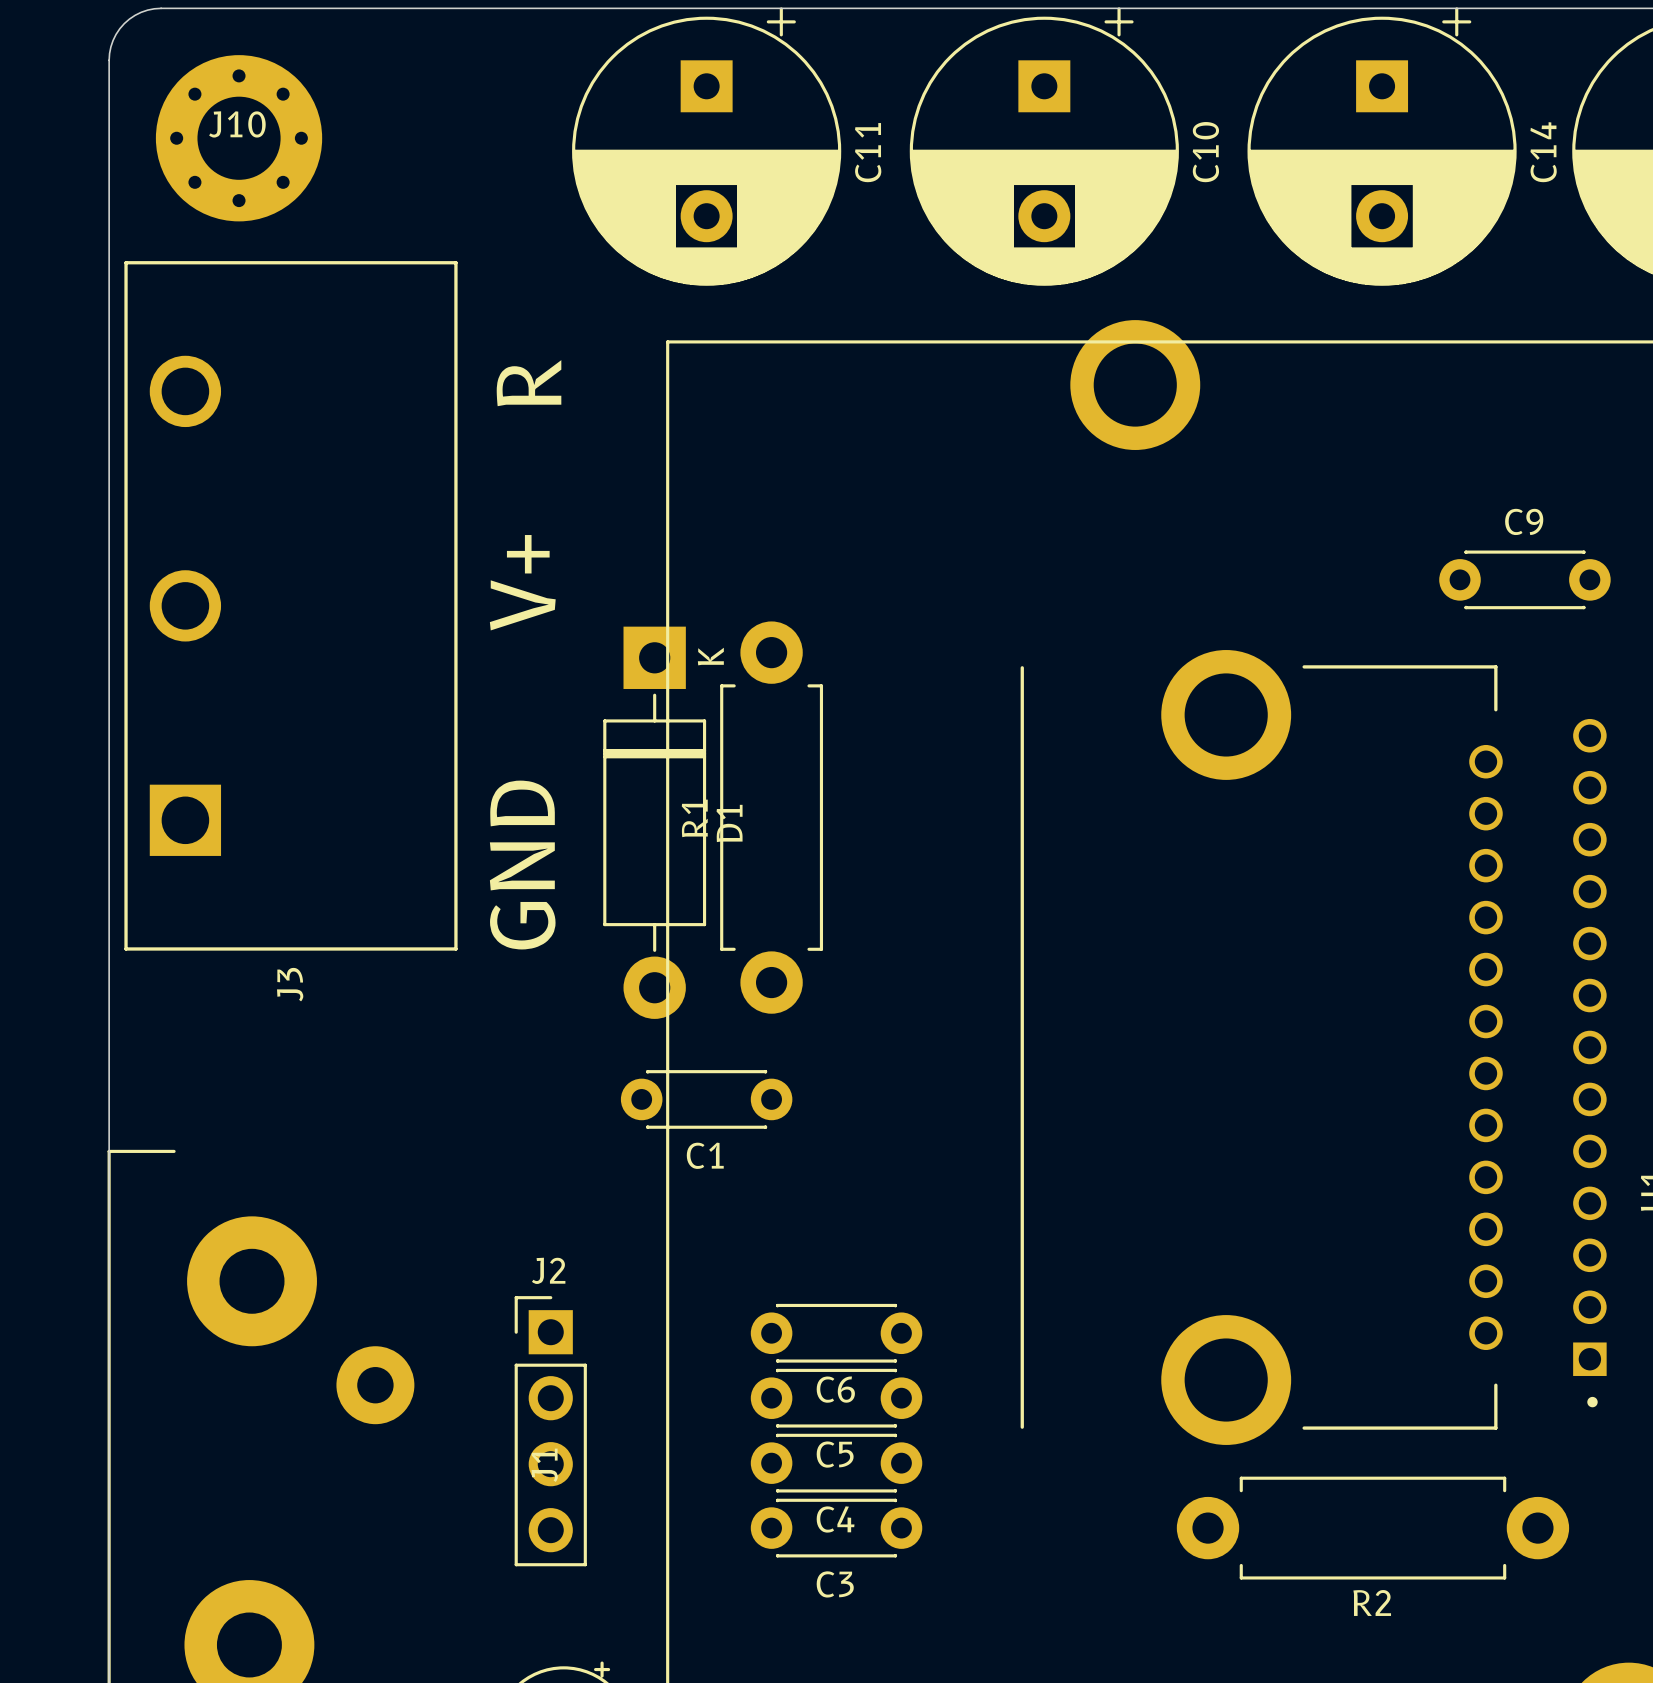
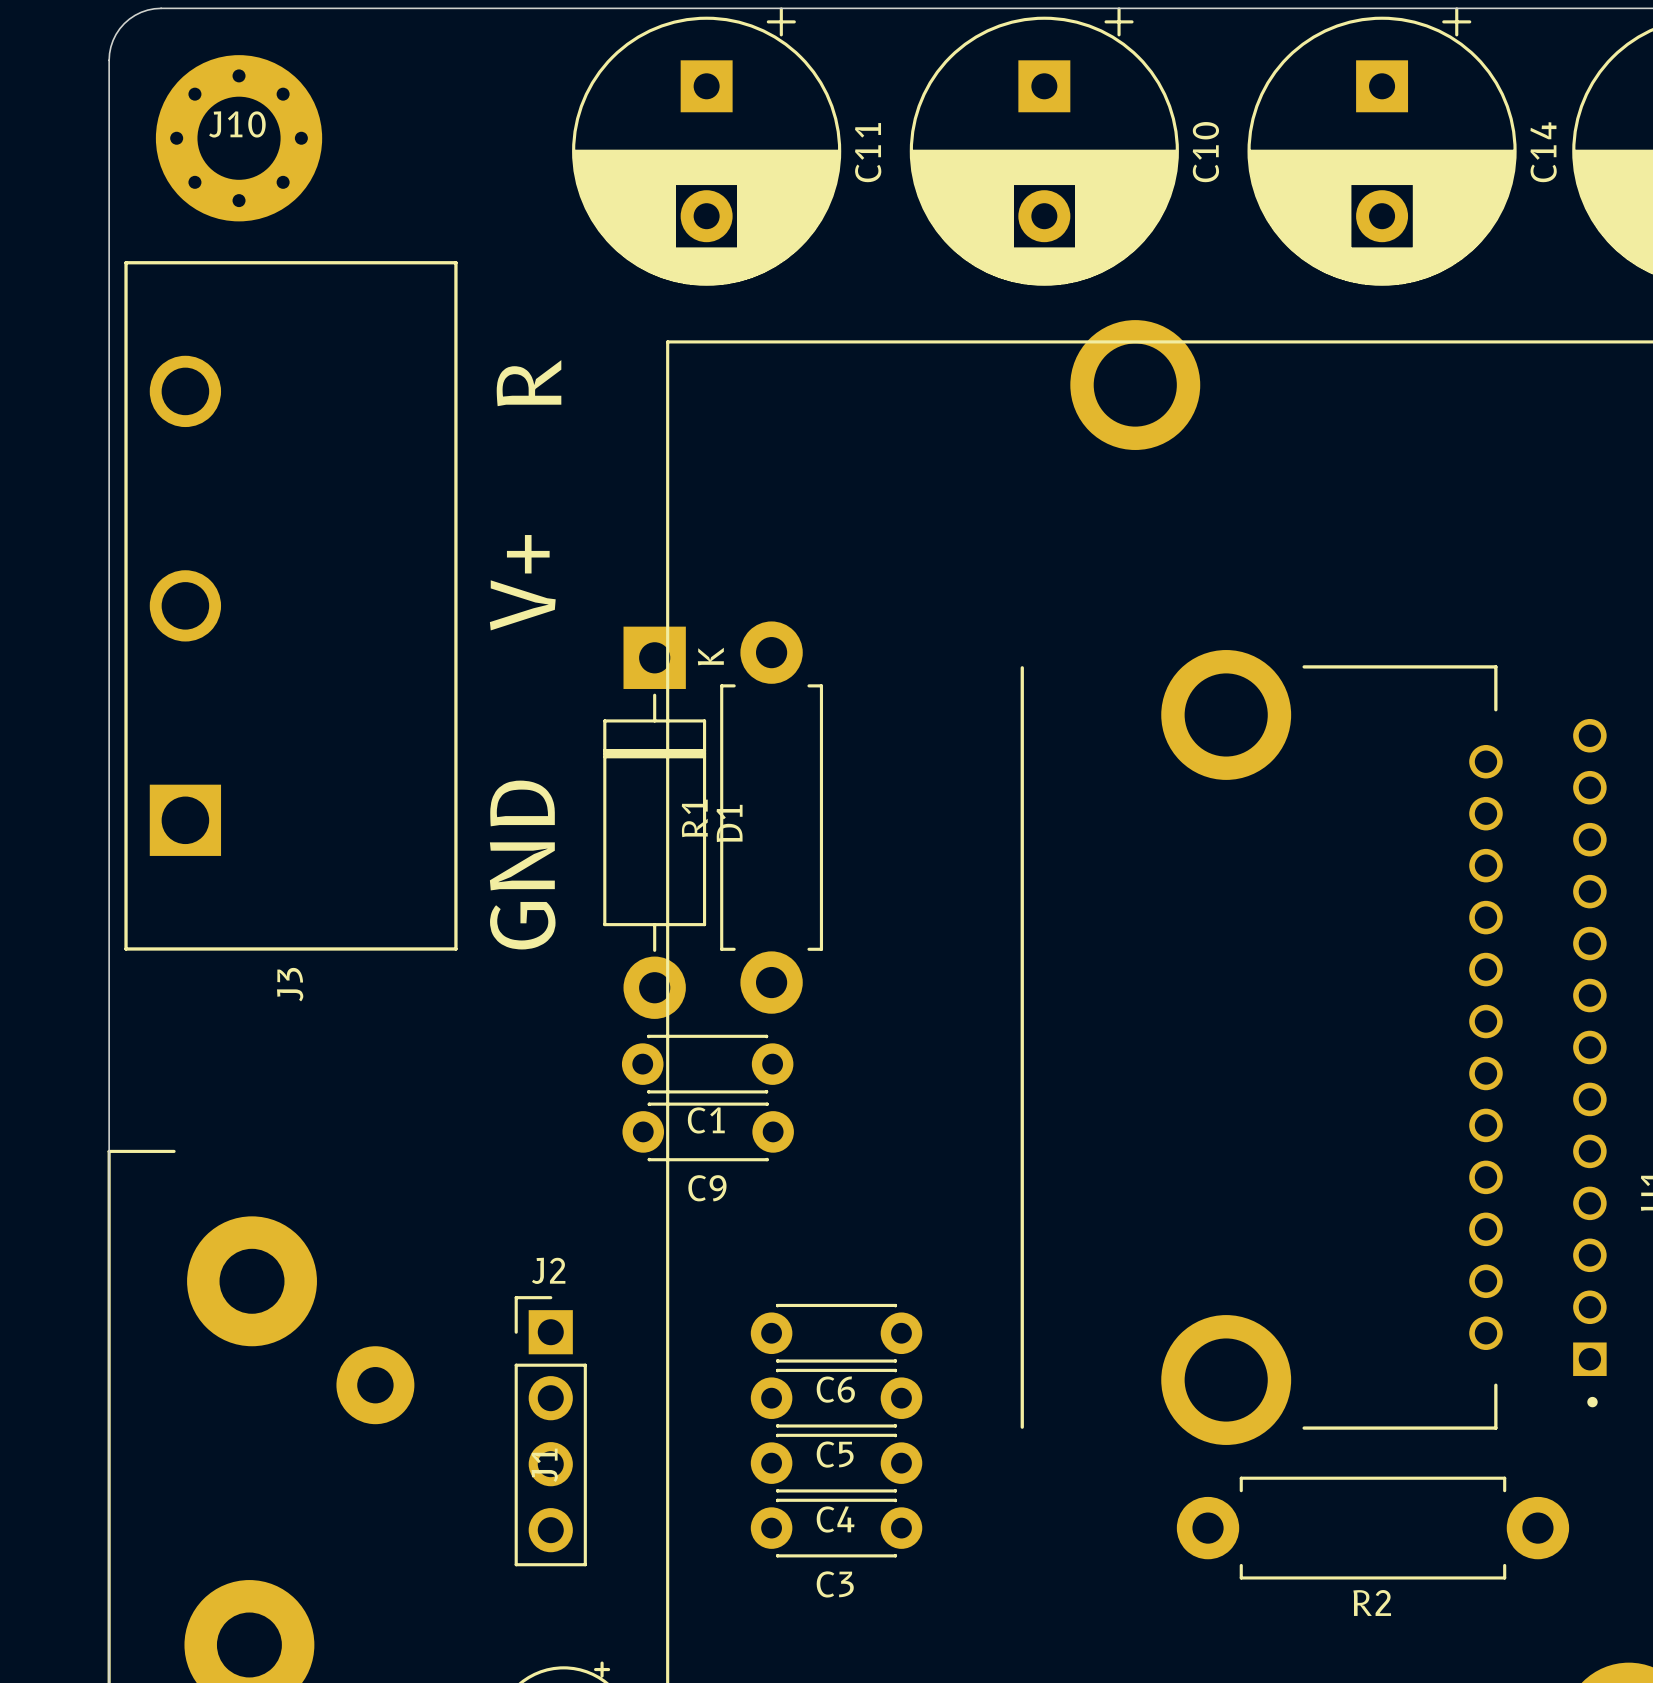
C9 name position: C9 (1524, 521) -> C9 (707, 1188)
C9 position: (1524, 579) -> (708, 1131)
C1 position: (706, 1099) -> (707, 1064)

